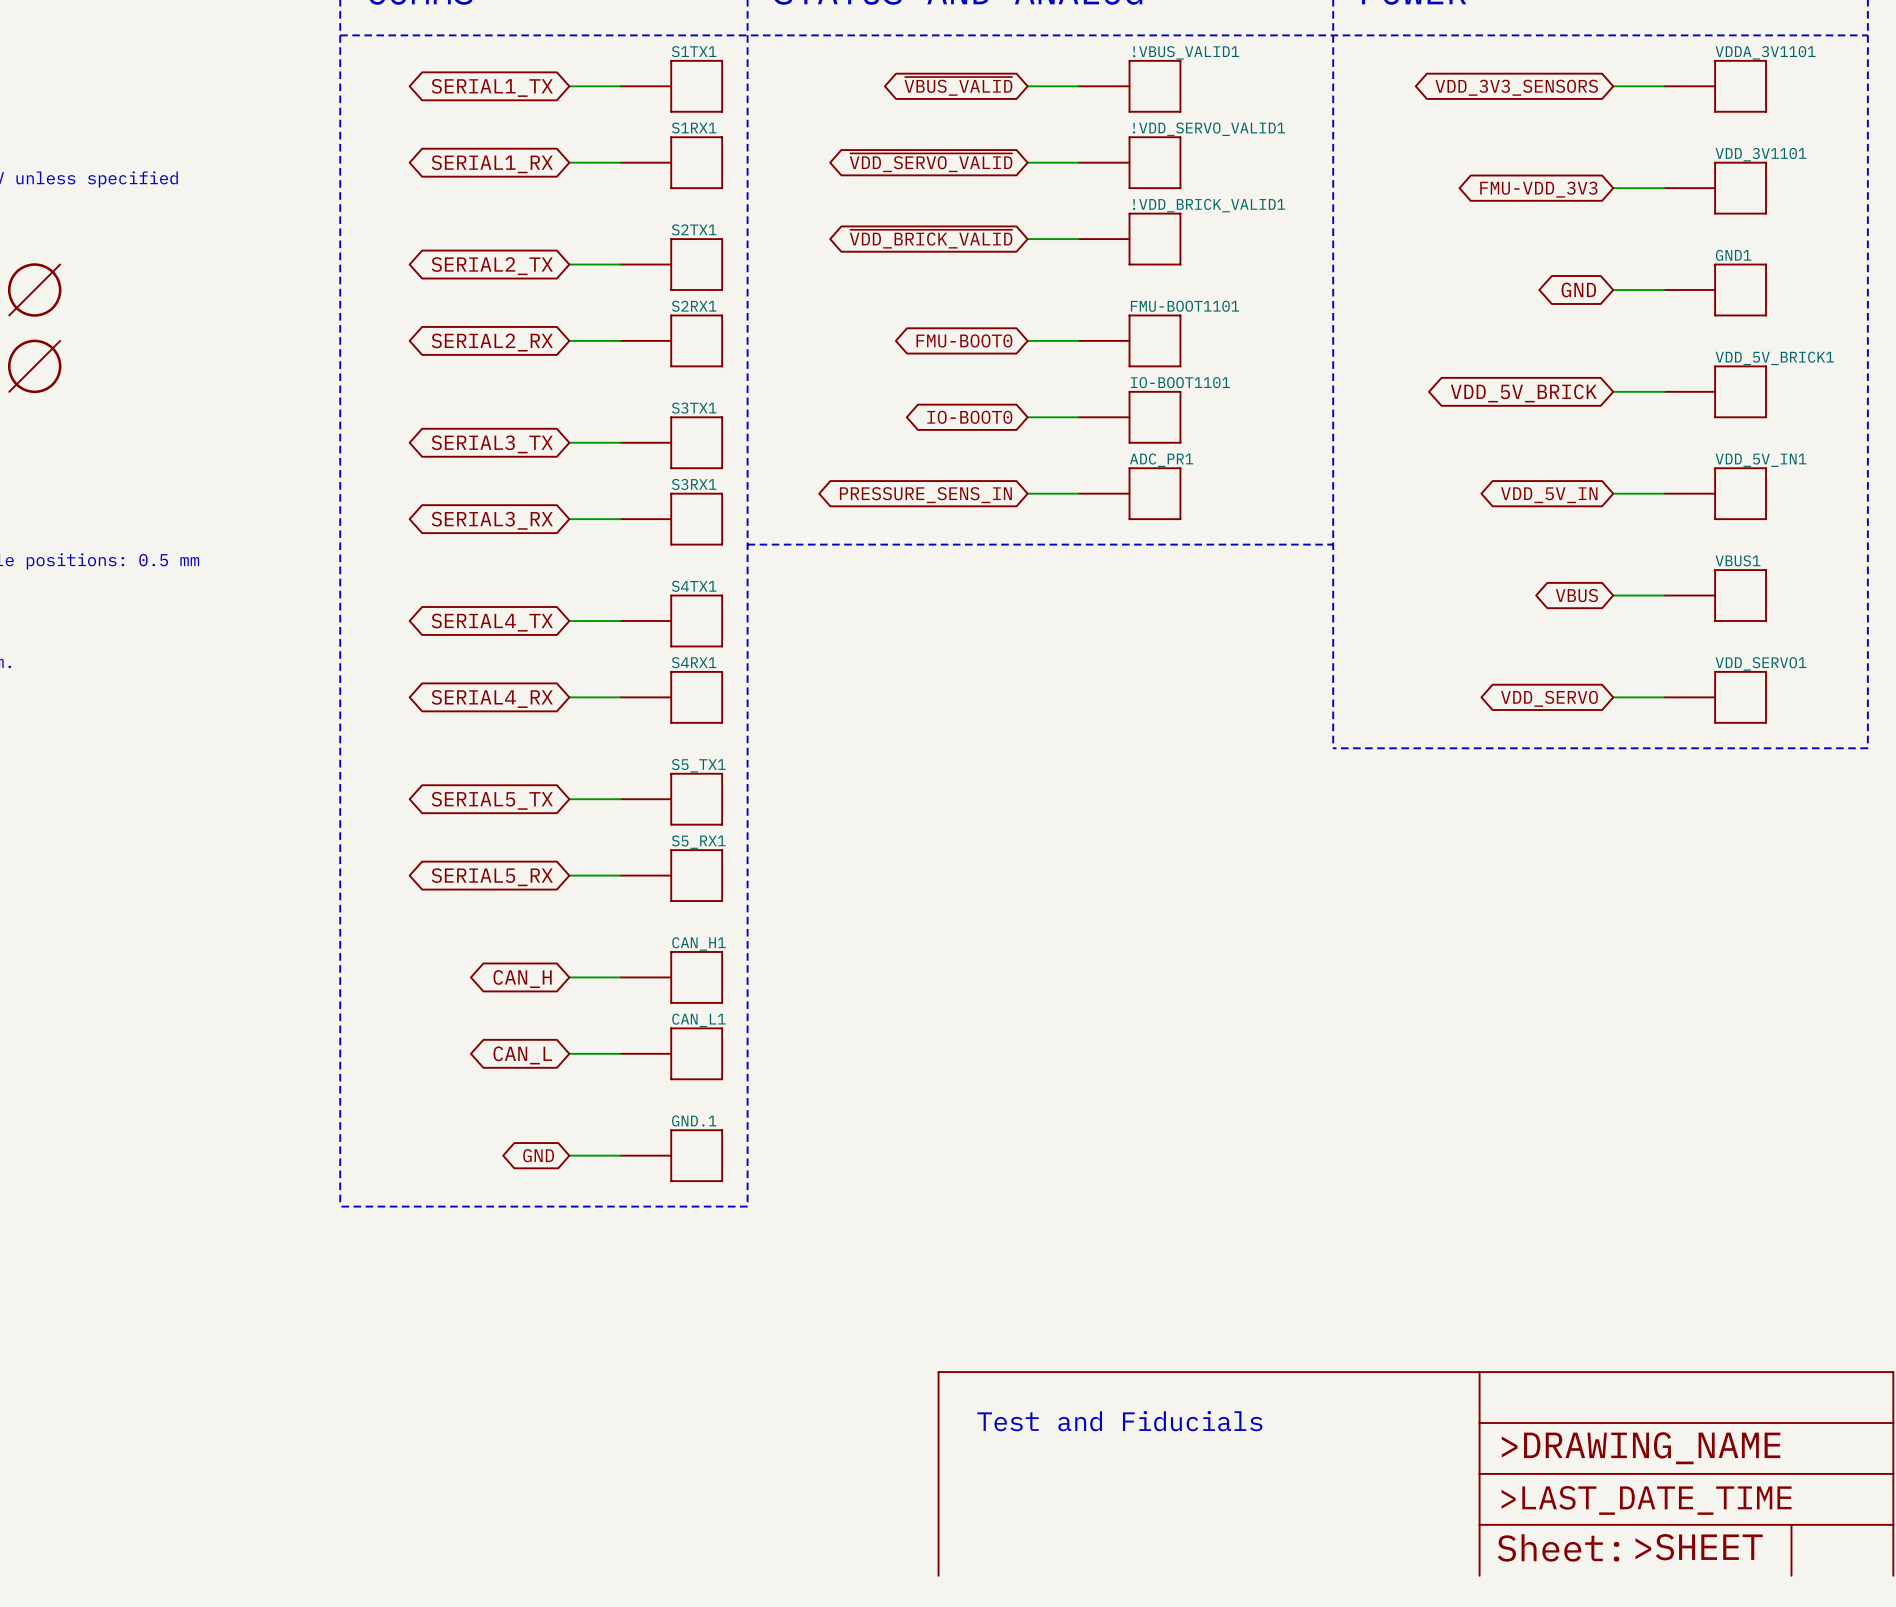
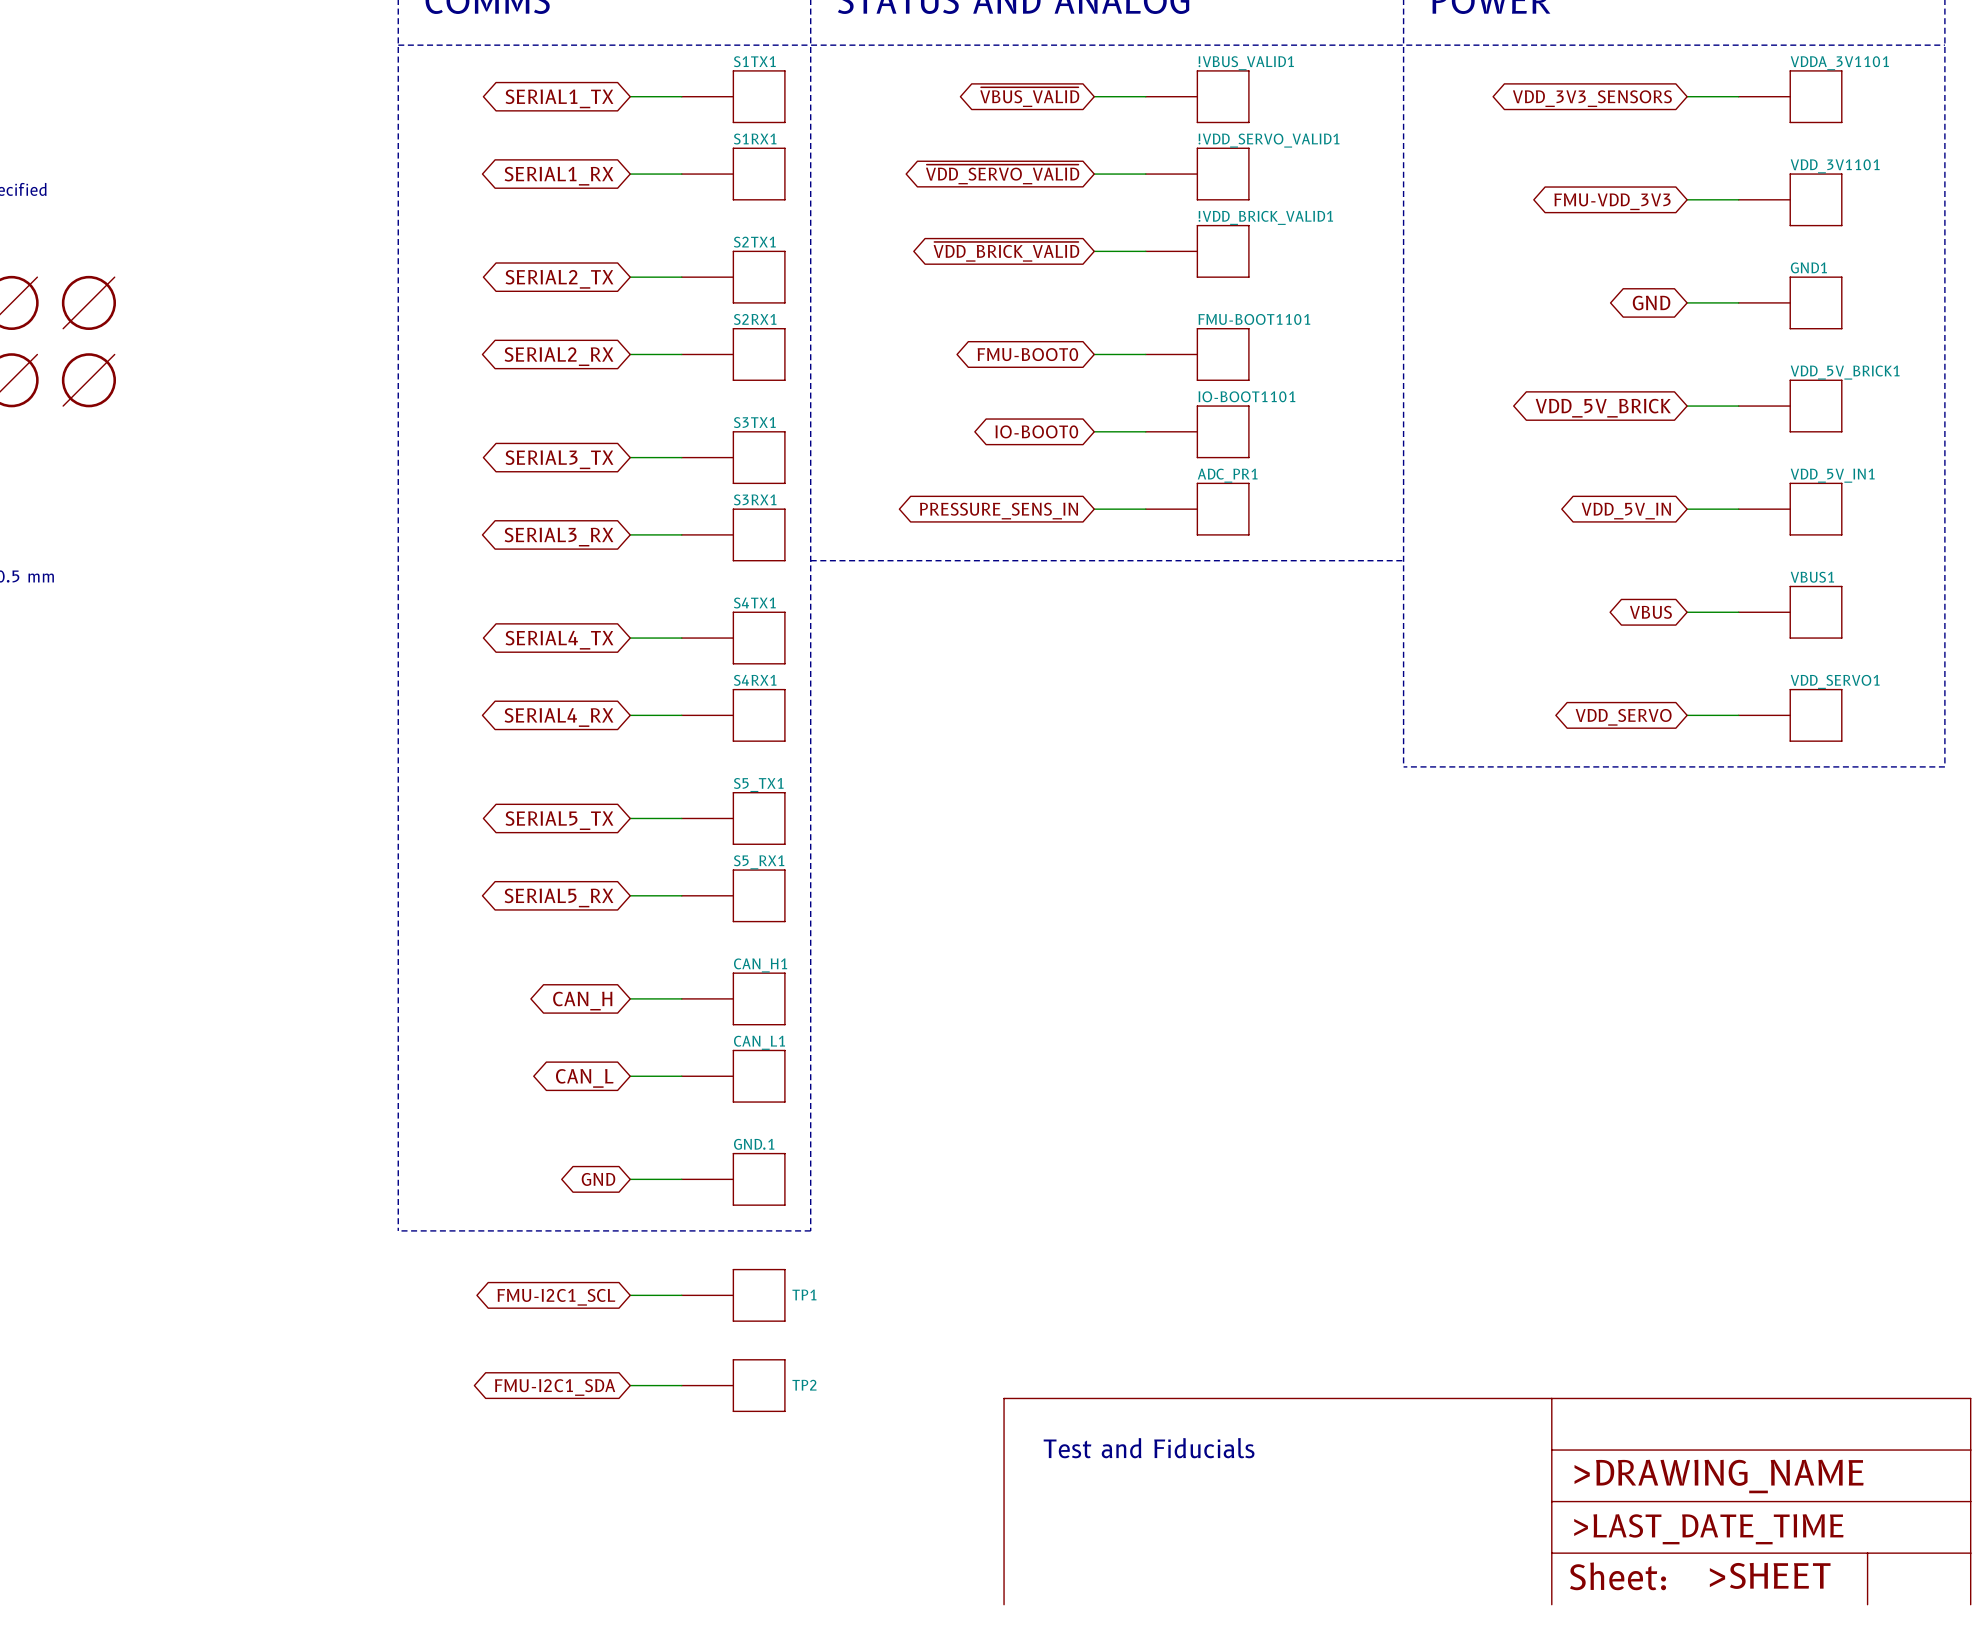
wire: none -> (630, 1295) (681, 1295)
TP1: none -> (733, 1295)
global label: none -> FMU-I2C1_SCL (556, 1297)
wire: none -> (630, 1385) (681, 1385)
TP2: none -> (733, 1385)
global label: none -> FMU-I2C1_SDA (555, 1387)

